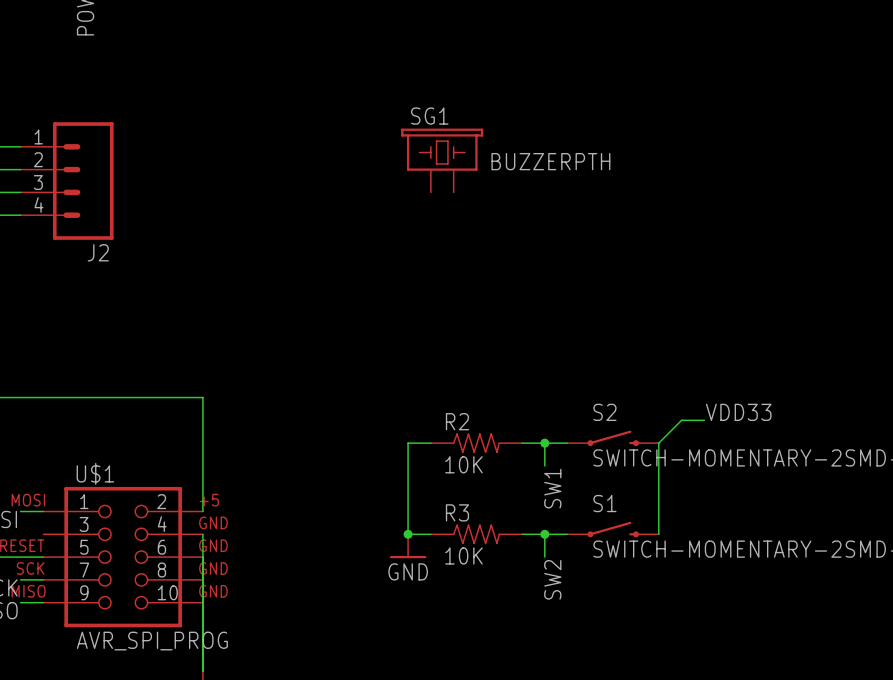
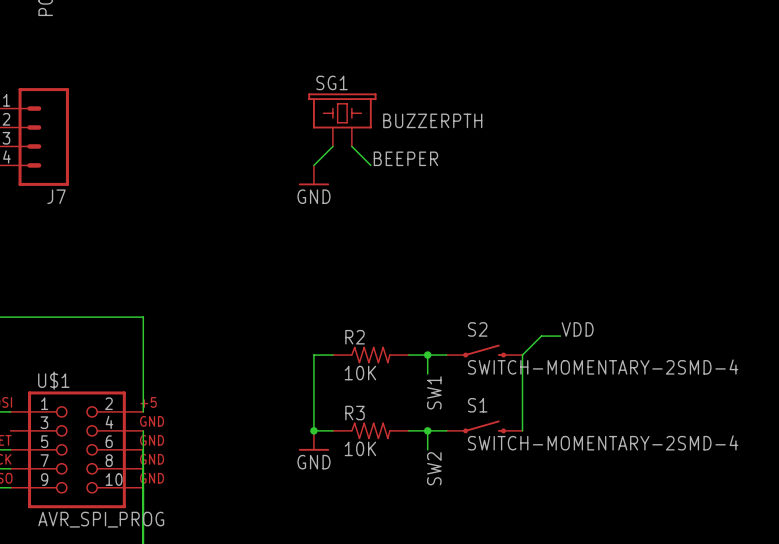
wire: none -> (332, 146) (313, 165)
wire: none -> (351, 146) (370, 165)
label: none -> BEEPER (405, 158)
power symbol: none -> GND (313, 175)
J2 name: J2 (98, 252) -> J7 (56, 196)
label: VDD33 (738, 412) -> VDD (577, 329)

